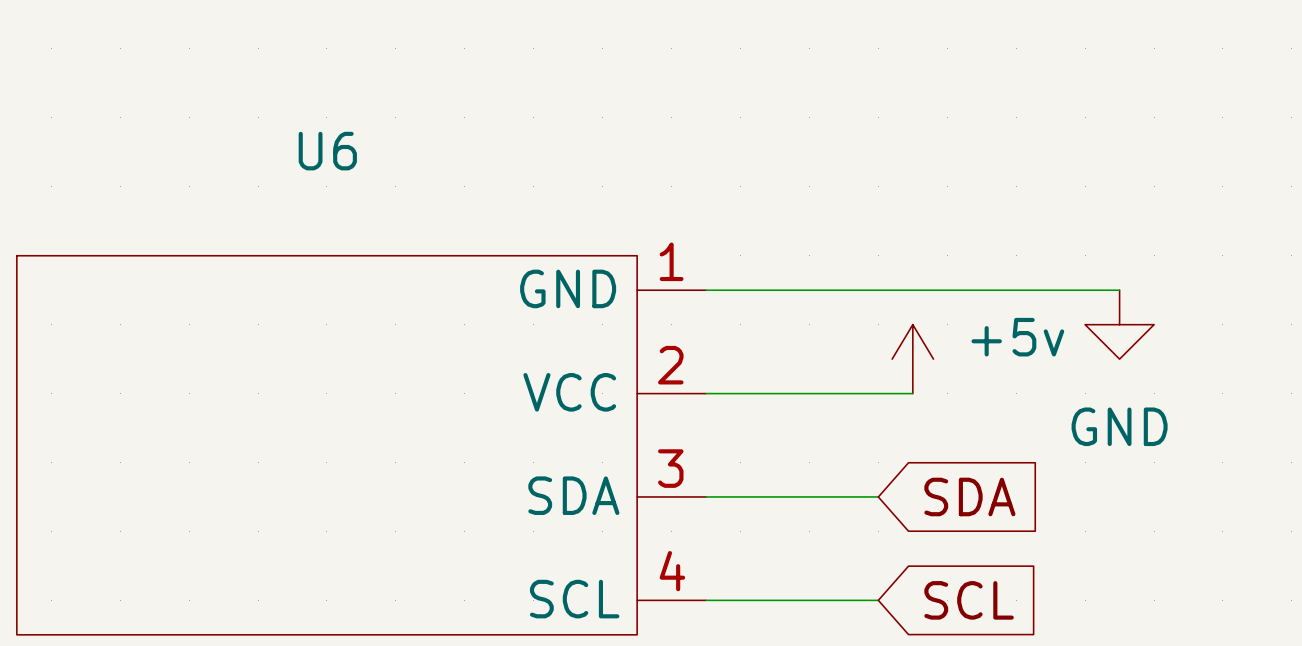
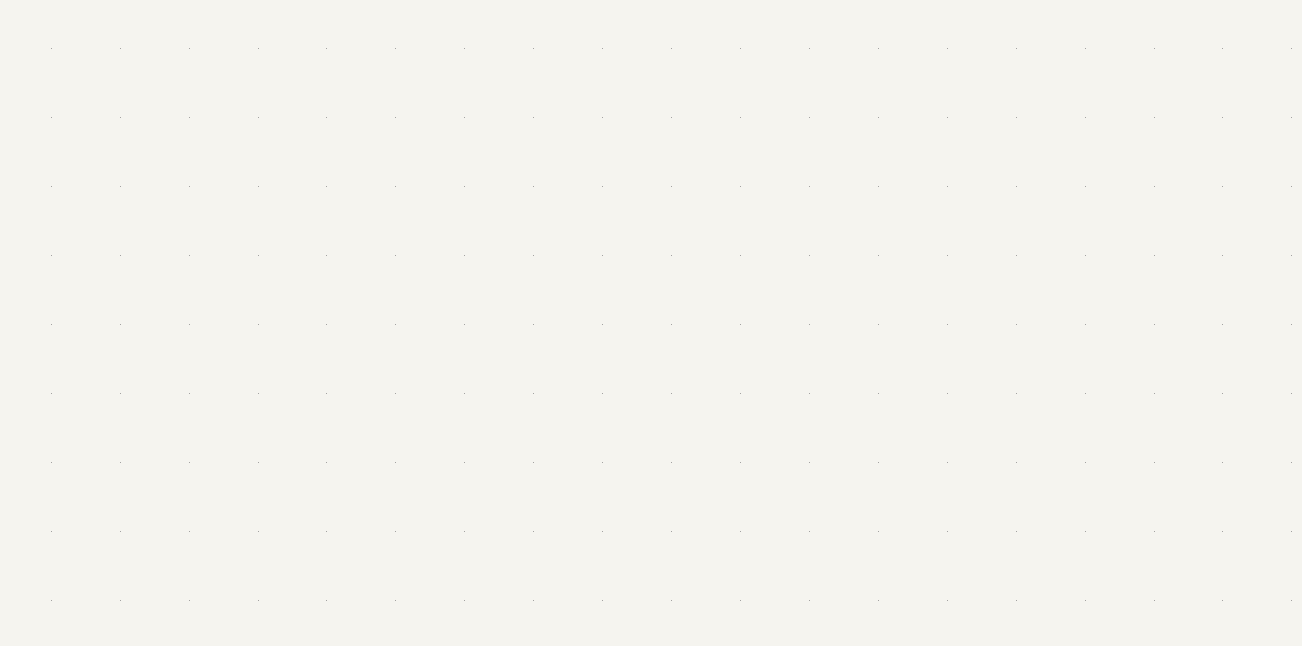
wire: (706, 290) (1119, 290) -> none
power symbol: GND (1119, 324) -> none
power symbol: +5v (912, 359) -> none
wire: (706, 393) (912, 393) -> none
U6: (361, 445) -> none
wire: (706, 496) (878, 496) -> none
global label: SDA (969, 496) -> none
wire: (706, 600) (878, 600) -> none
global label: SCL (969, 600) -> none

